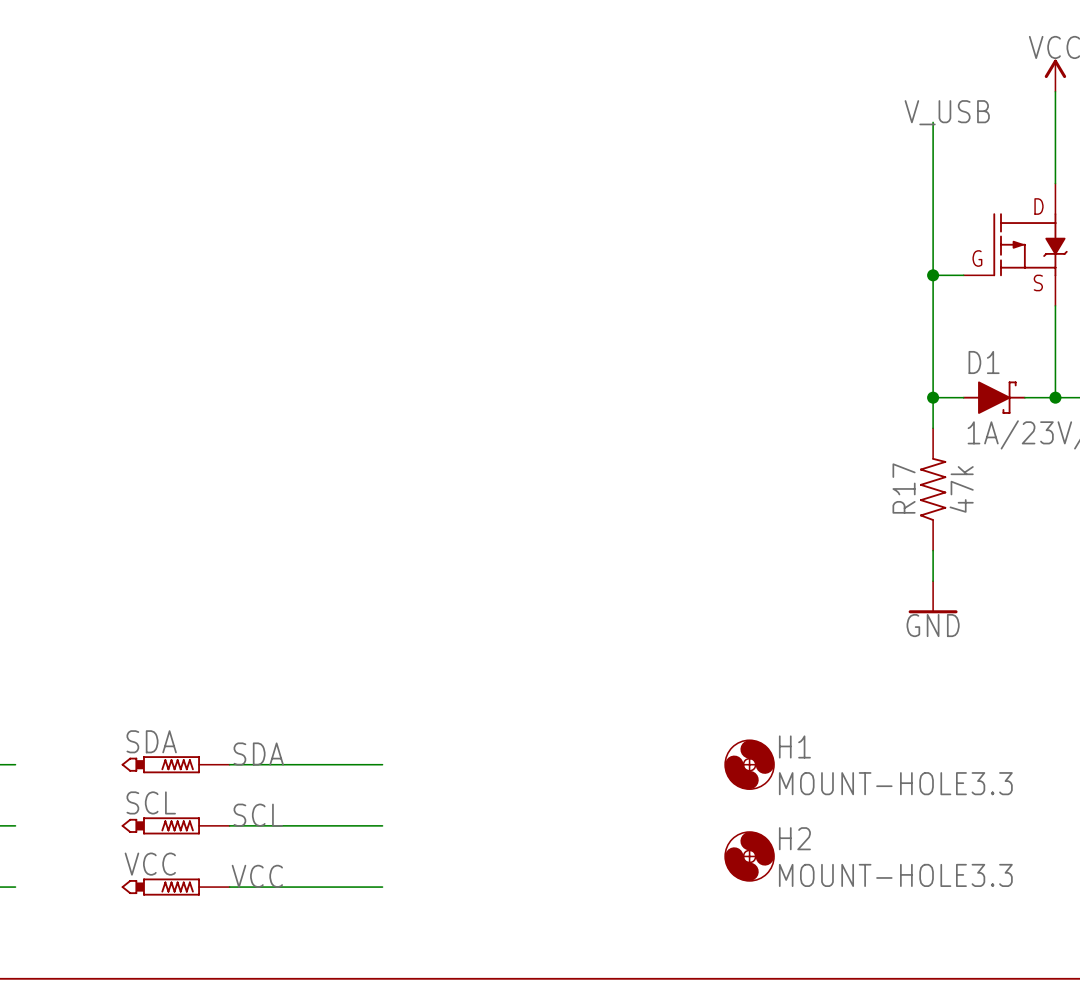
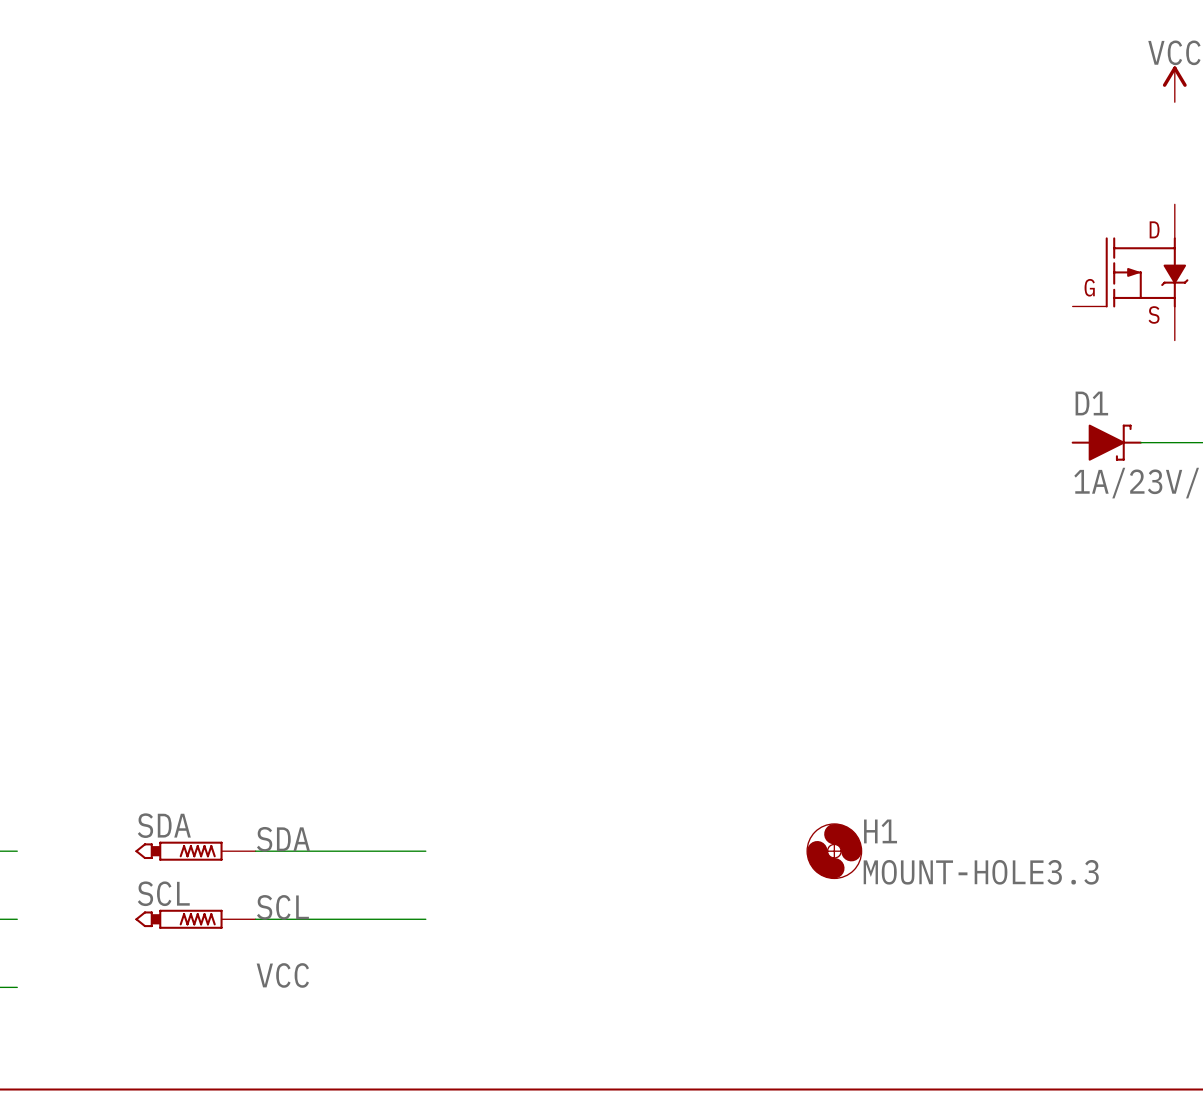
wire: (1055, 91) (1055, 183) -> none
label: V_USB (947, 112) -> none
wire: (933, 122) (933, 428) -> none
wire: (933, 275) (963, 275) -> none
junction: (933, 275) -> none
wire: (1055, 305) (1055, 397) -> none
wire: (933, 397) (963, 397) -> none
junction: (933, 397) -> none
junction: (1055, 397) -> none
R17: 47k (933, 489) -> none
wire: (933, 550) (933, 581) -> none
power symbol: GND (933, 597) -> none
H2: MOUNT-HOLE3.3 (749, 856) -> none
VCC: (175, 887) -> none
wire: (229, 887) (382, 887) -> none

